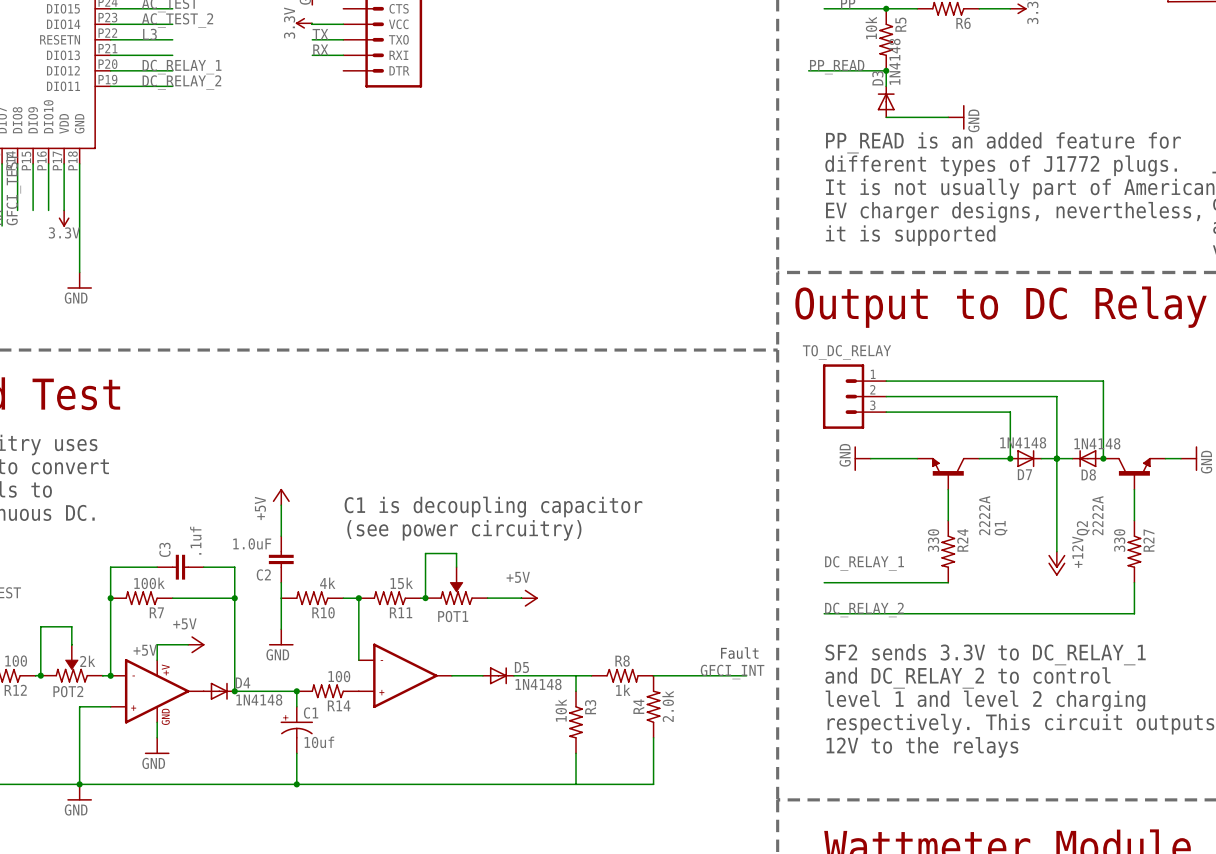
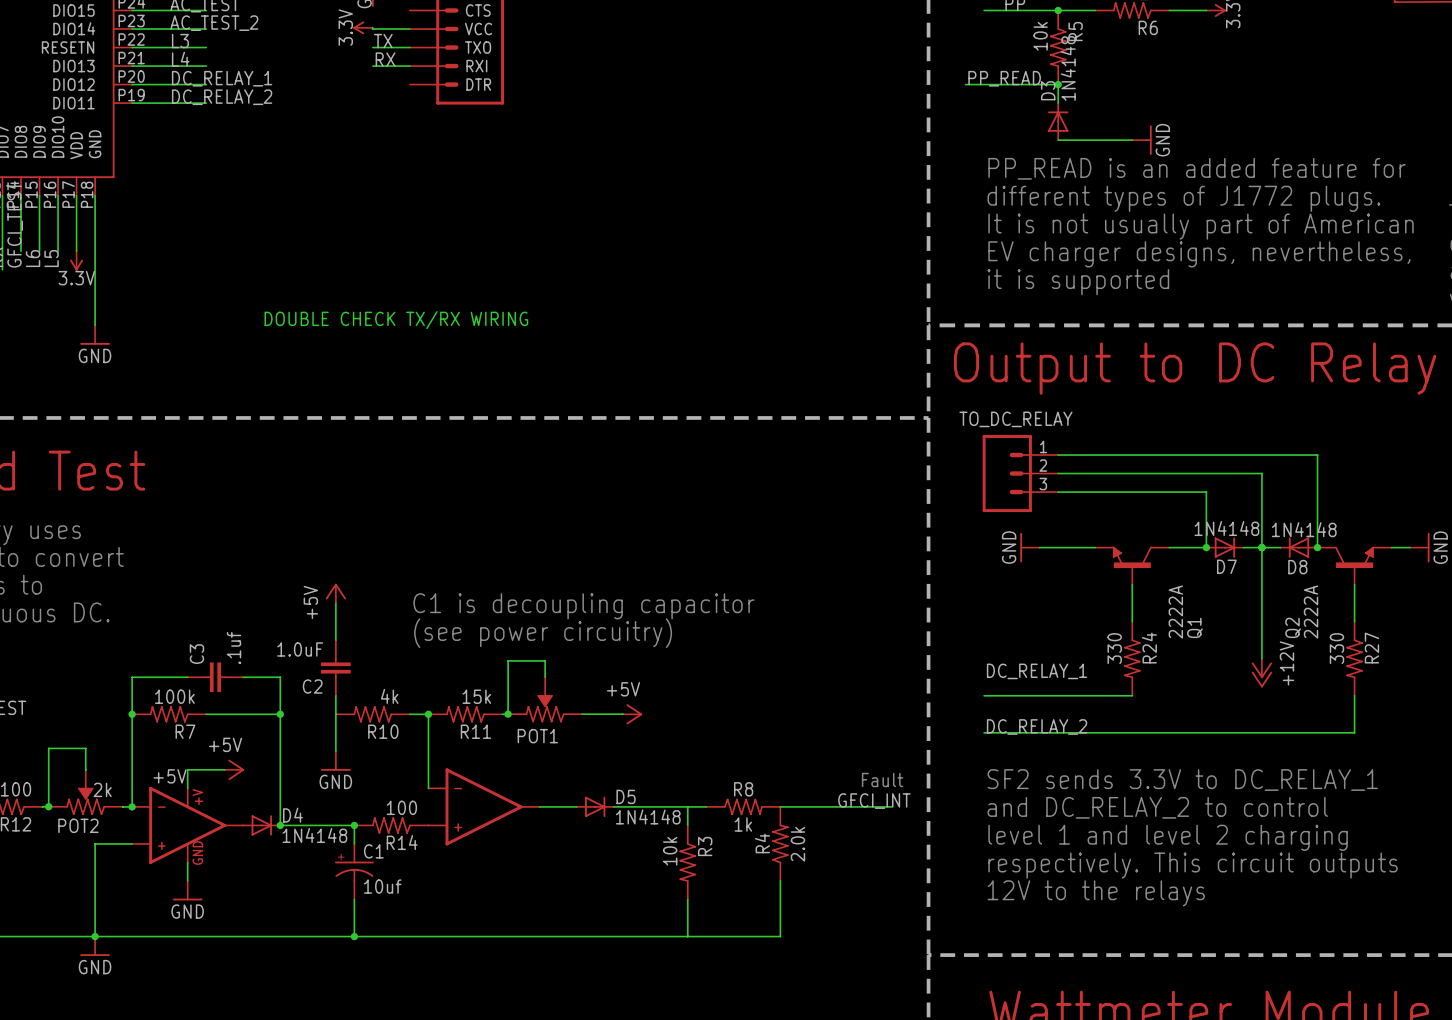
label: none -> L4 (180, 59)
label: none -> L6 (33, 258)
label: none -> L5 (51, 258)
text: none -> DOUBLE CHECK TX/RX WIRING (396, 320)

